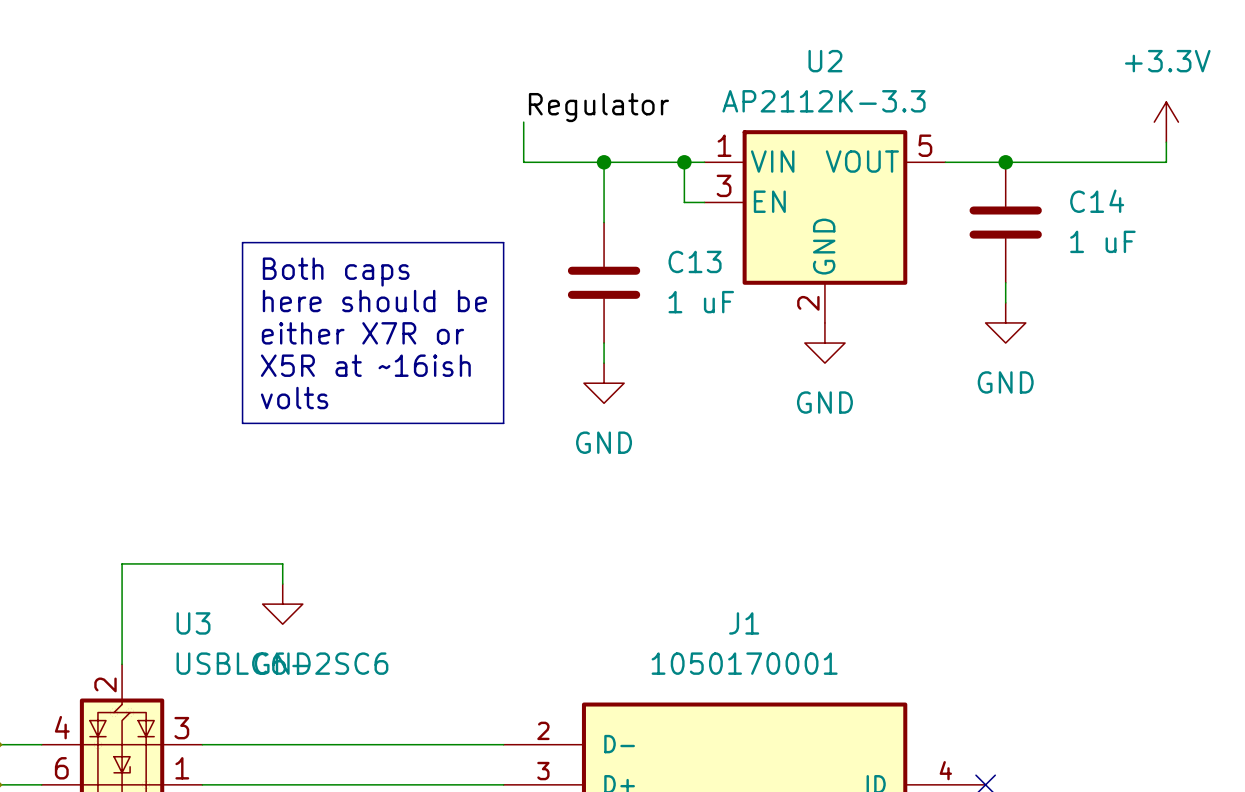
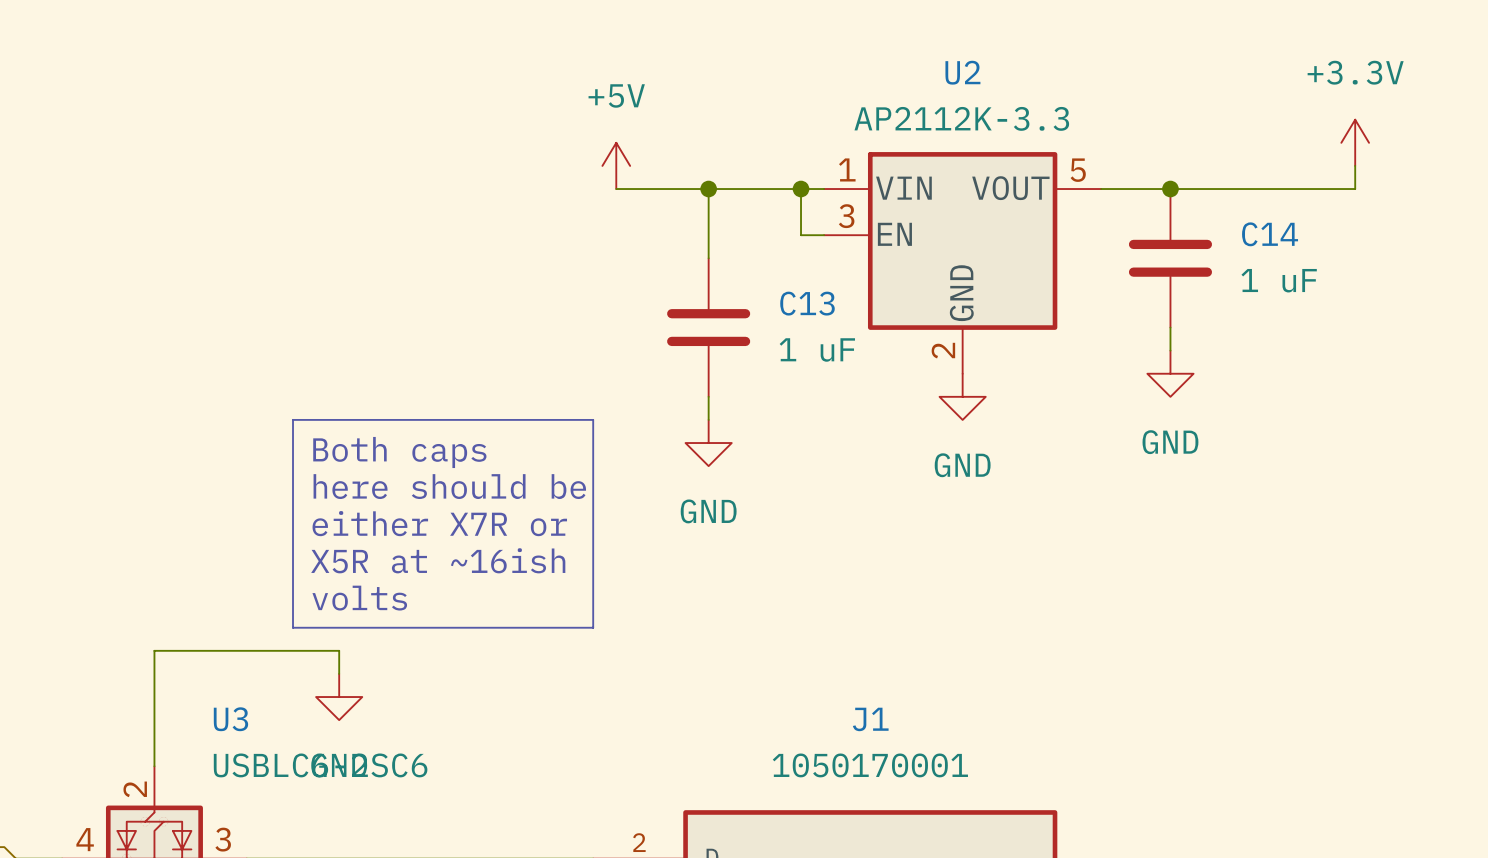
label: Regulator (598, 107) -> none
power symbol: none -> +5V (616, 165)
text: Both caps (336, 272) -> none
text position: here should be (374, 301) -> here should be (449, 486)
text position: either X7R or (362, 333) -> either X7R or (439, 523)
line: (242, 363) (242, 242) (503, 242) (503, 363) -> (293, 419) (593, 419)
text position: X5R at ~16ish (365, 365) -> X5R at ~16ish (438, 560)
text: volts (294, 398) -> Both caps (399, 452)
line: (242, 423) (503, 423) -> (293, 489) (293, 627) (593, 627) (593, 489)
text: none -> volts (359, 598)

